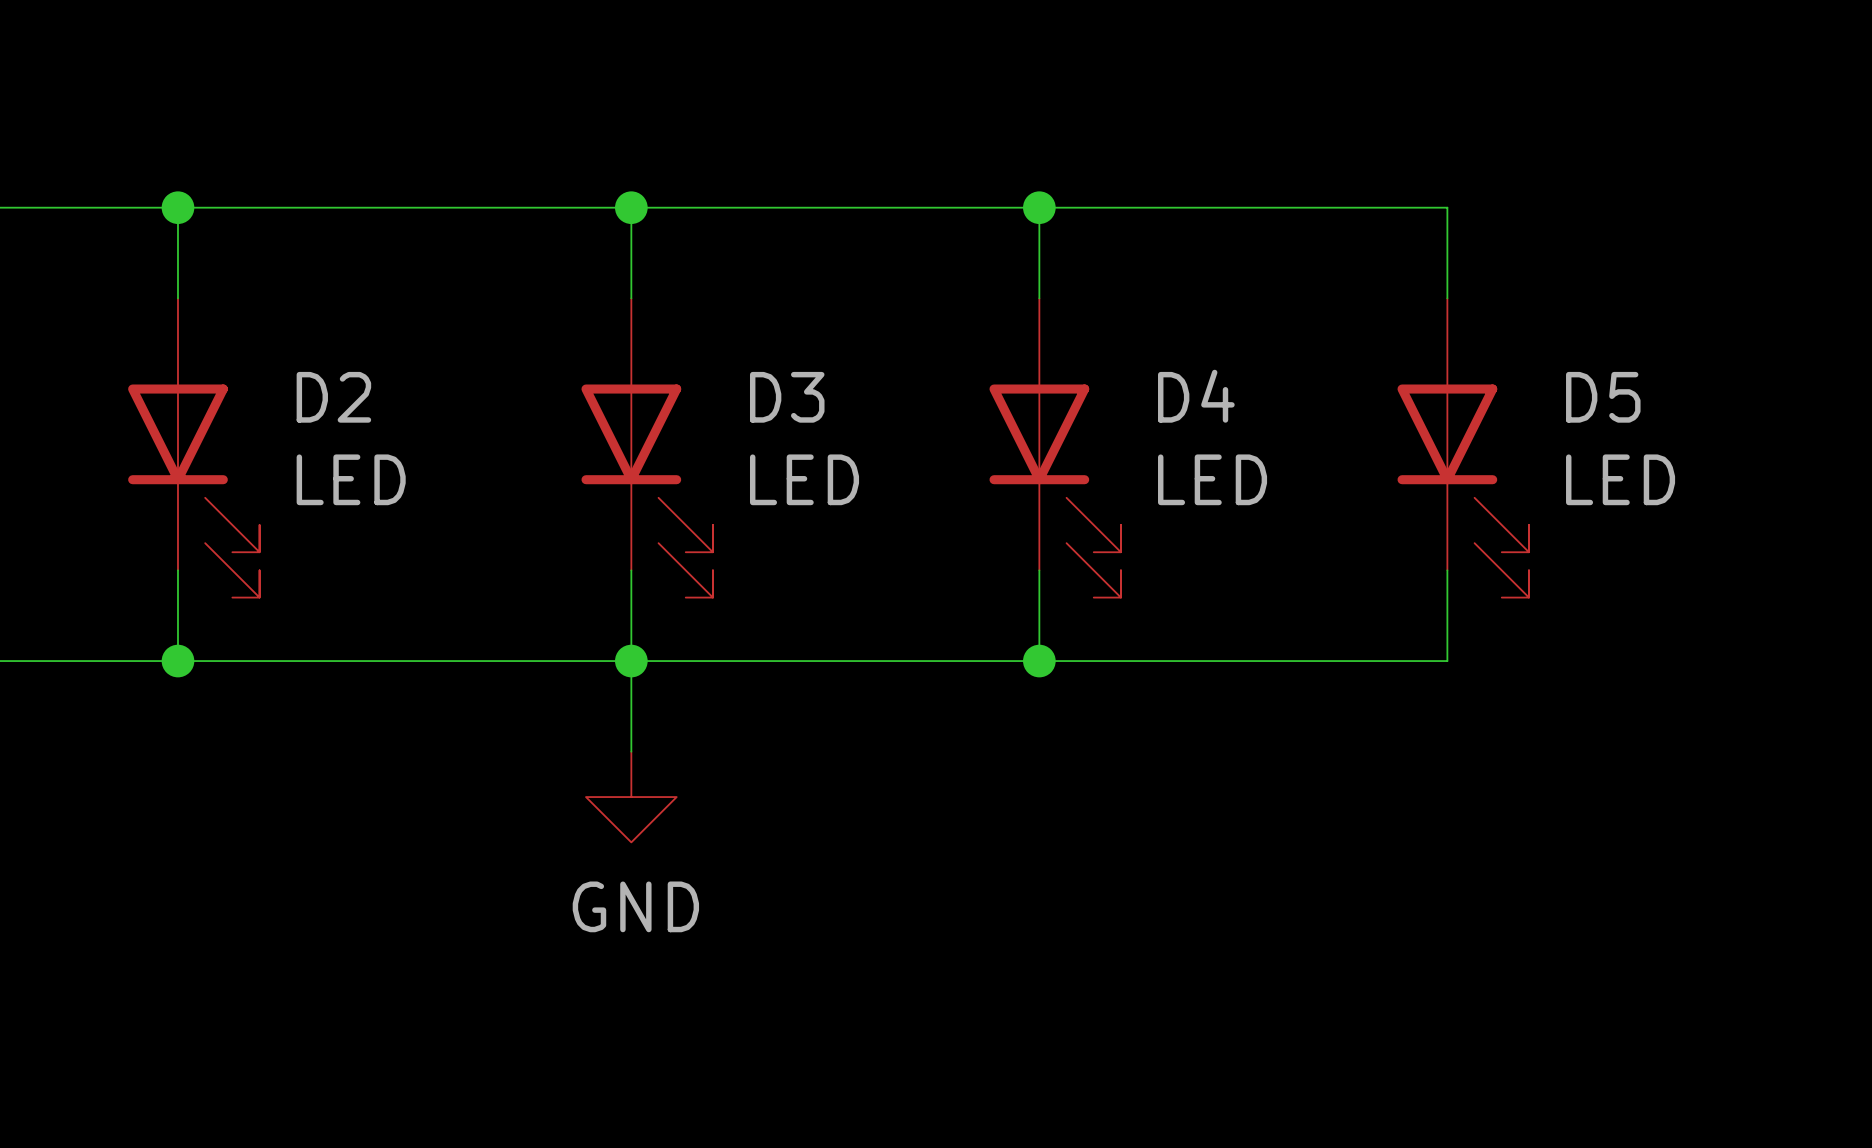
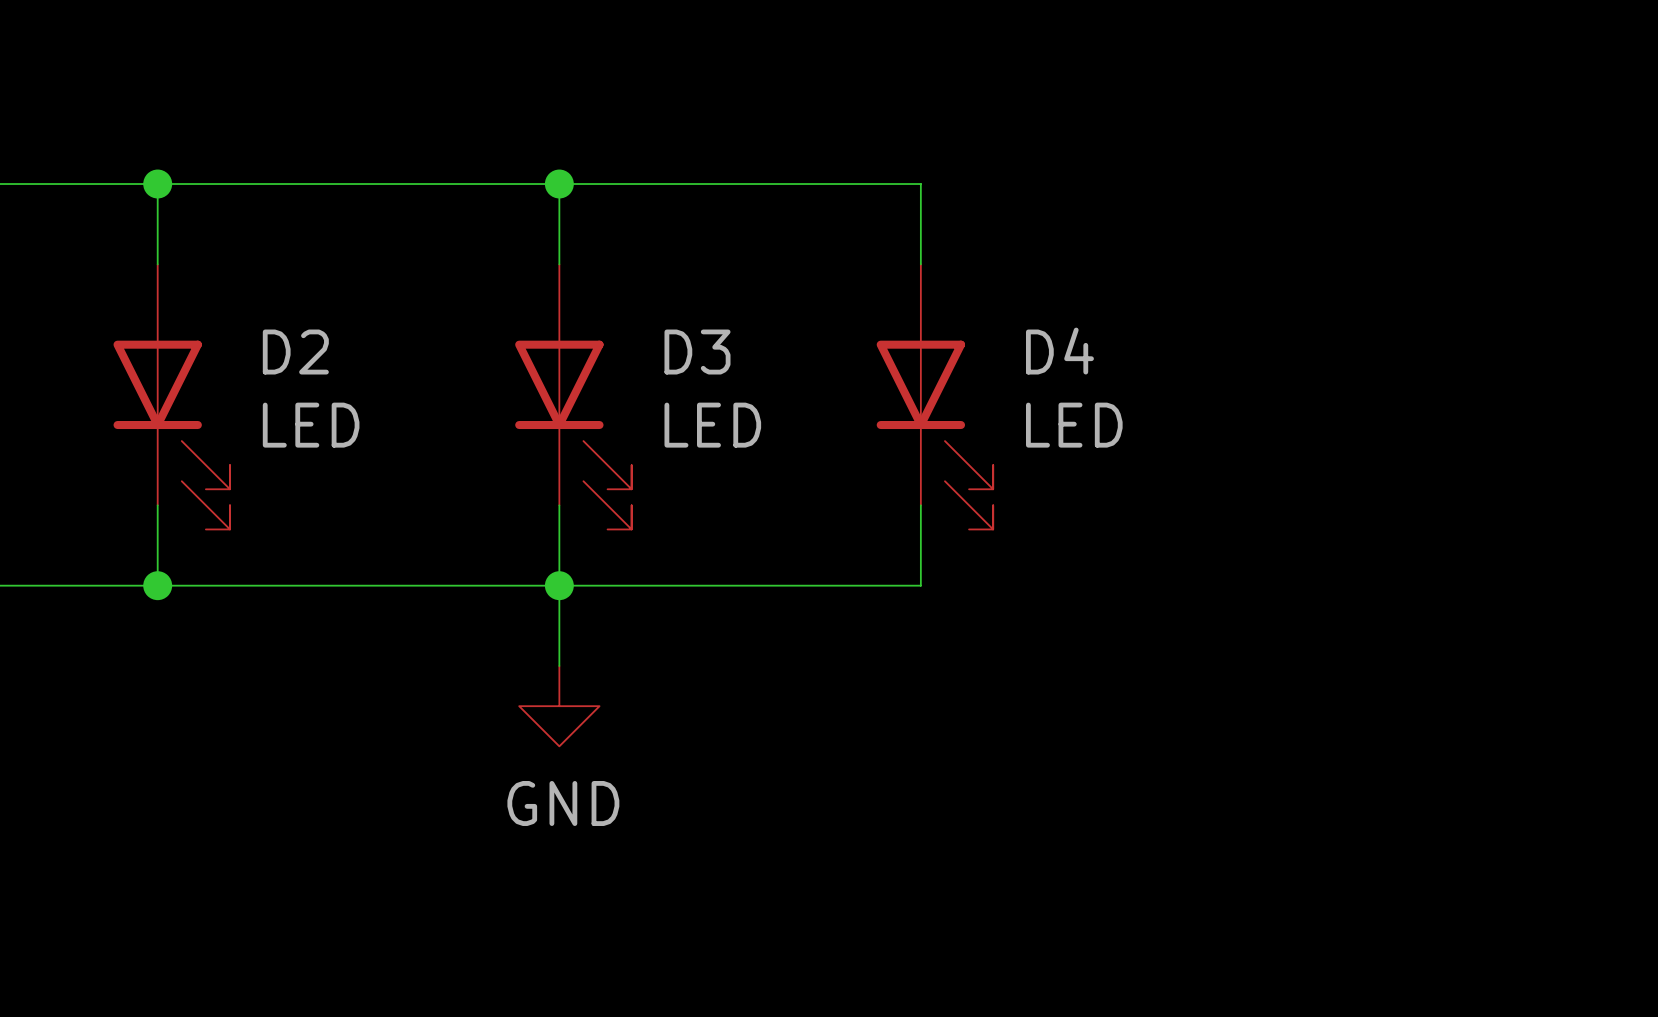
wire: (1039, 207) (1447, 207) (1447, 298) -> none
junction: (1039, 207) -> none
D5: LED (1463, 447) -> none
wire: (1447, 570) (1447, 661) (1039, 661) -> none
junction: (1039, 661) -> none

